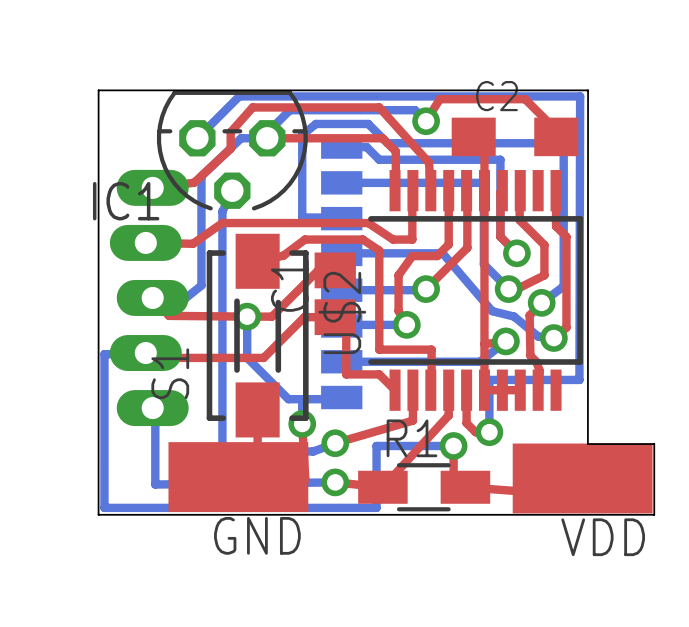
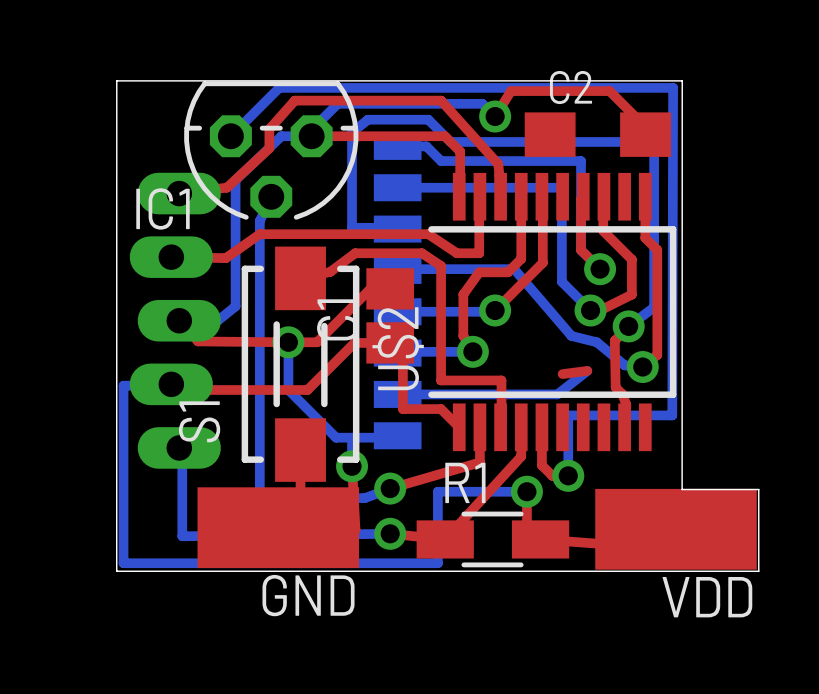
top track: (467, 134) (484, 152) (484, 390) (520, 390) -> none
via: (505, 341) -> none

